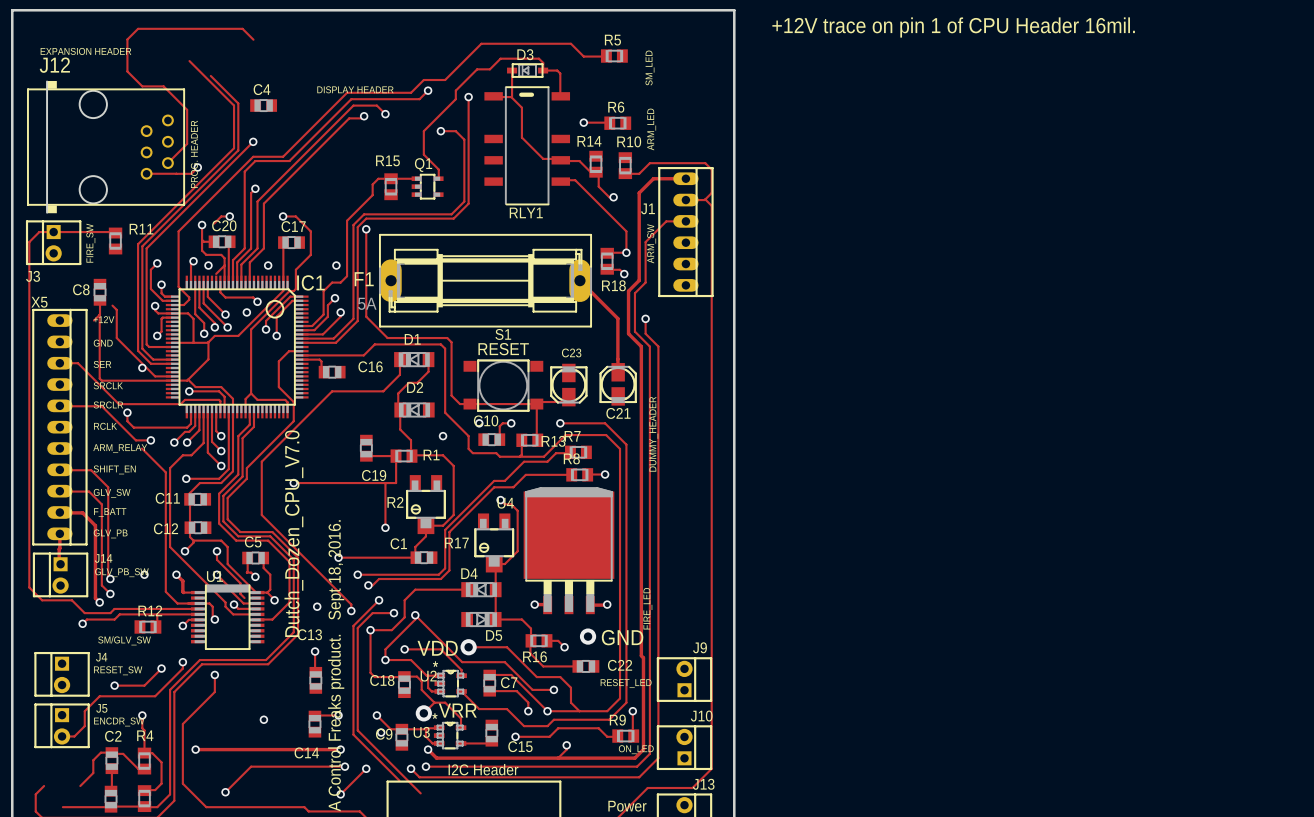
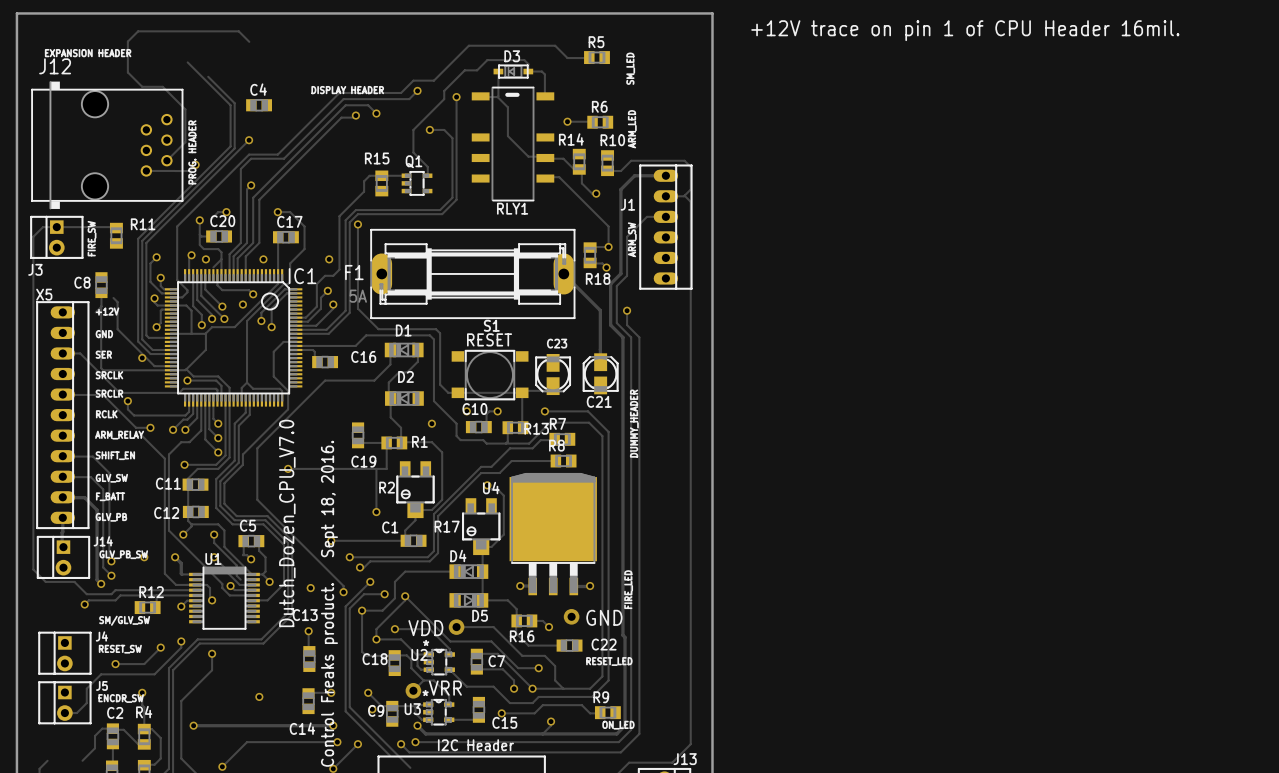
track: (228, 243) (228, 281) -> none
track: (605, 474) (587, 474) -> none
via: (605, 474) -> none
J9: (684, 679) -> none
track: (632, 711) (633, 736) -> none
via: (632, 711) -> none
J10: (684, 747) -> none

